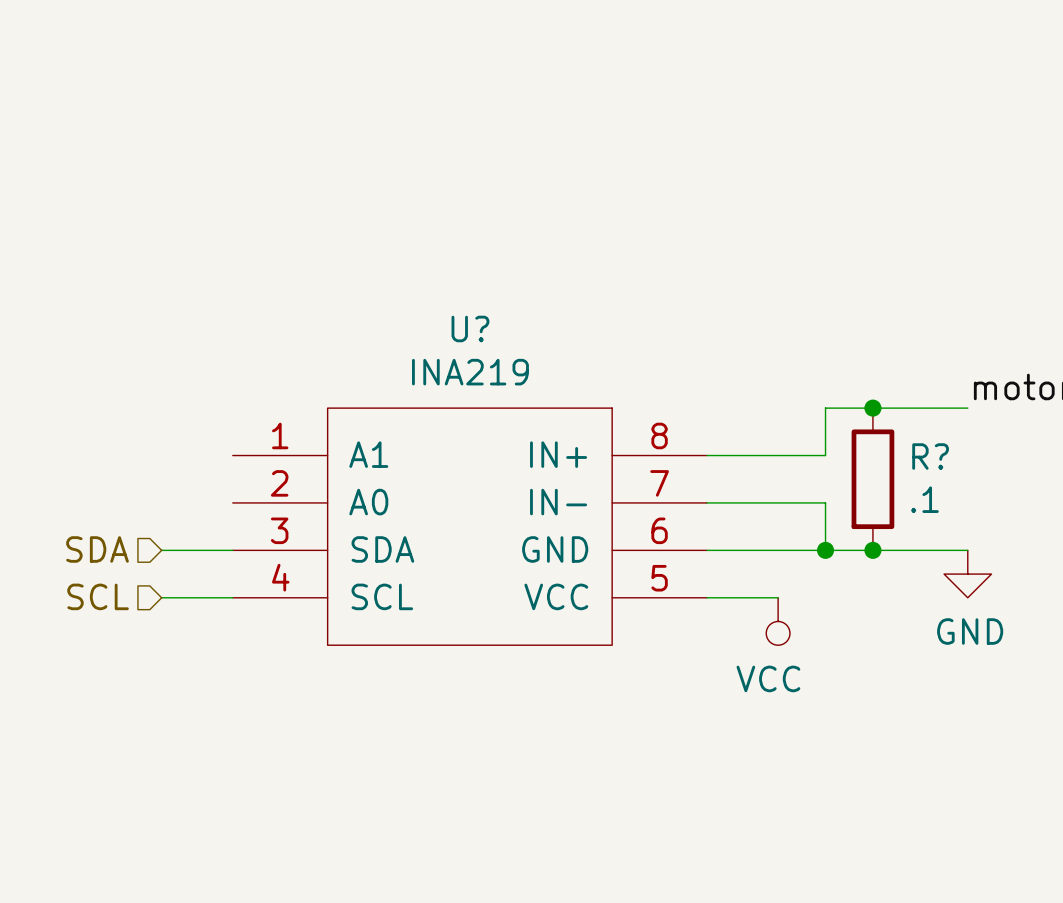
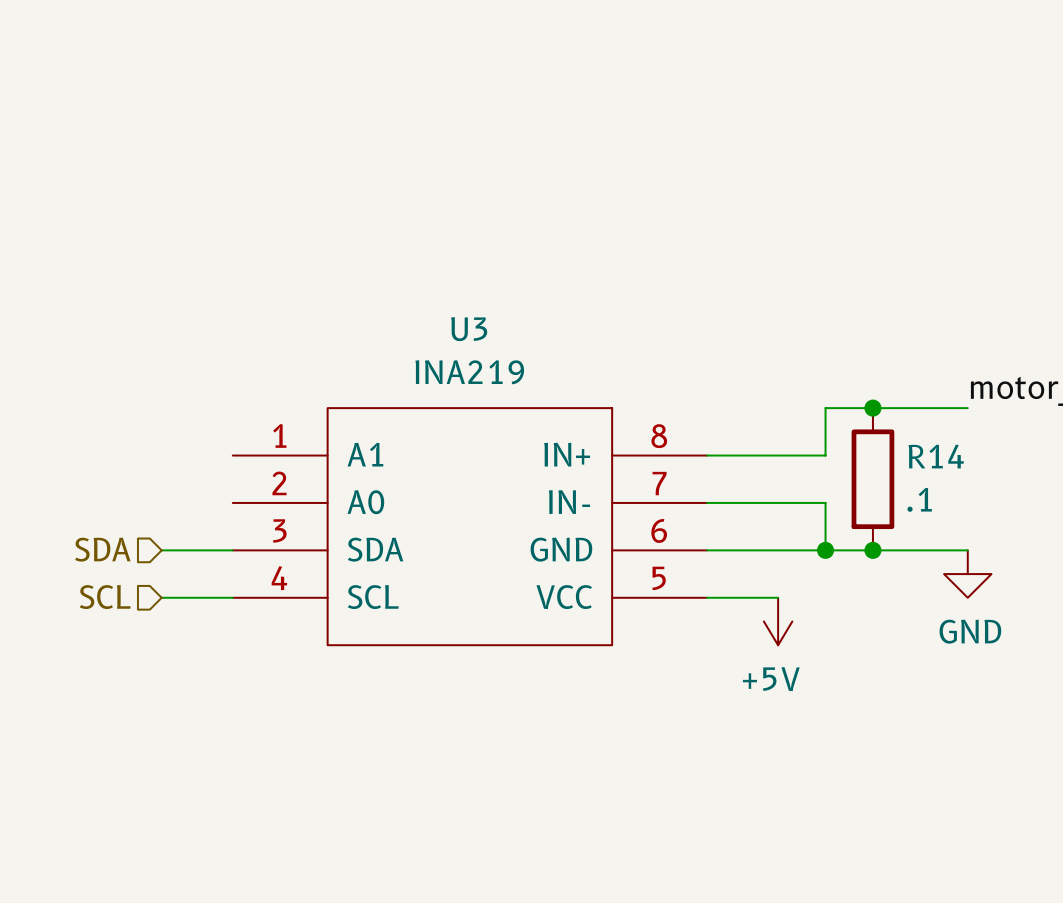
U? name: U? (470, 328) -> U3 (469, 329)
R? name: R? (930, 456) -> R14 (936, 456)
power symbol: VCC (778, 621) -> +5V (778, 621)

